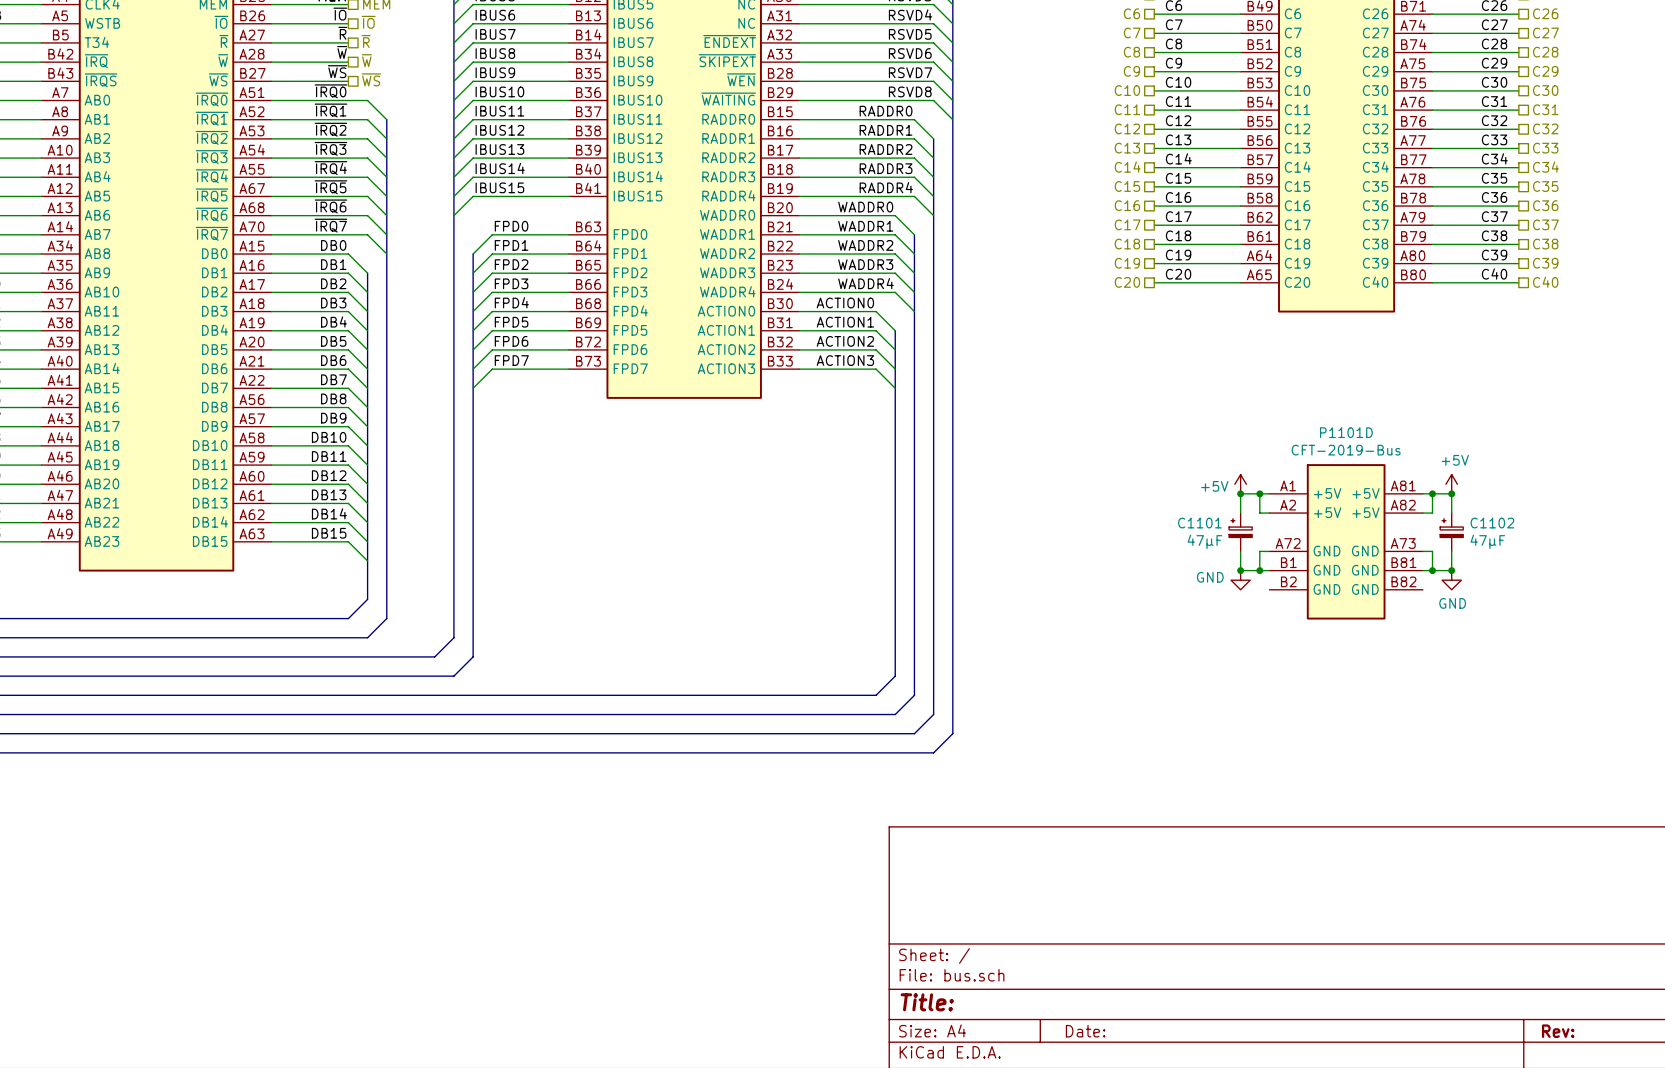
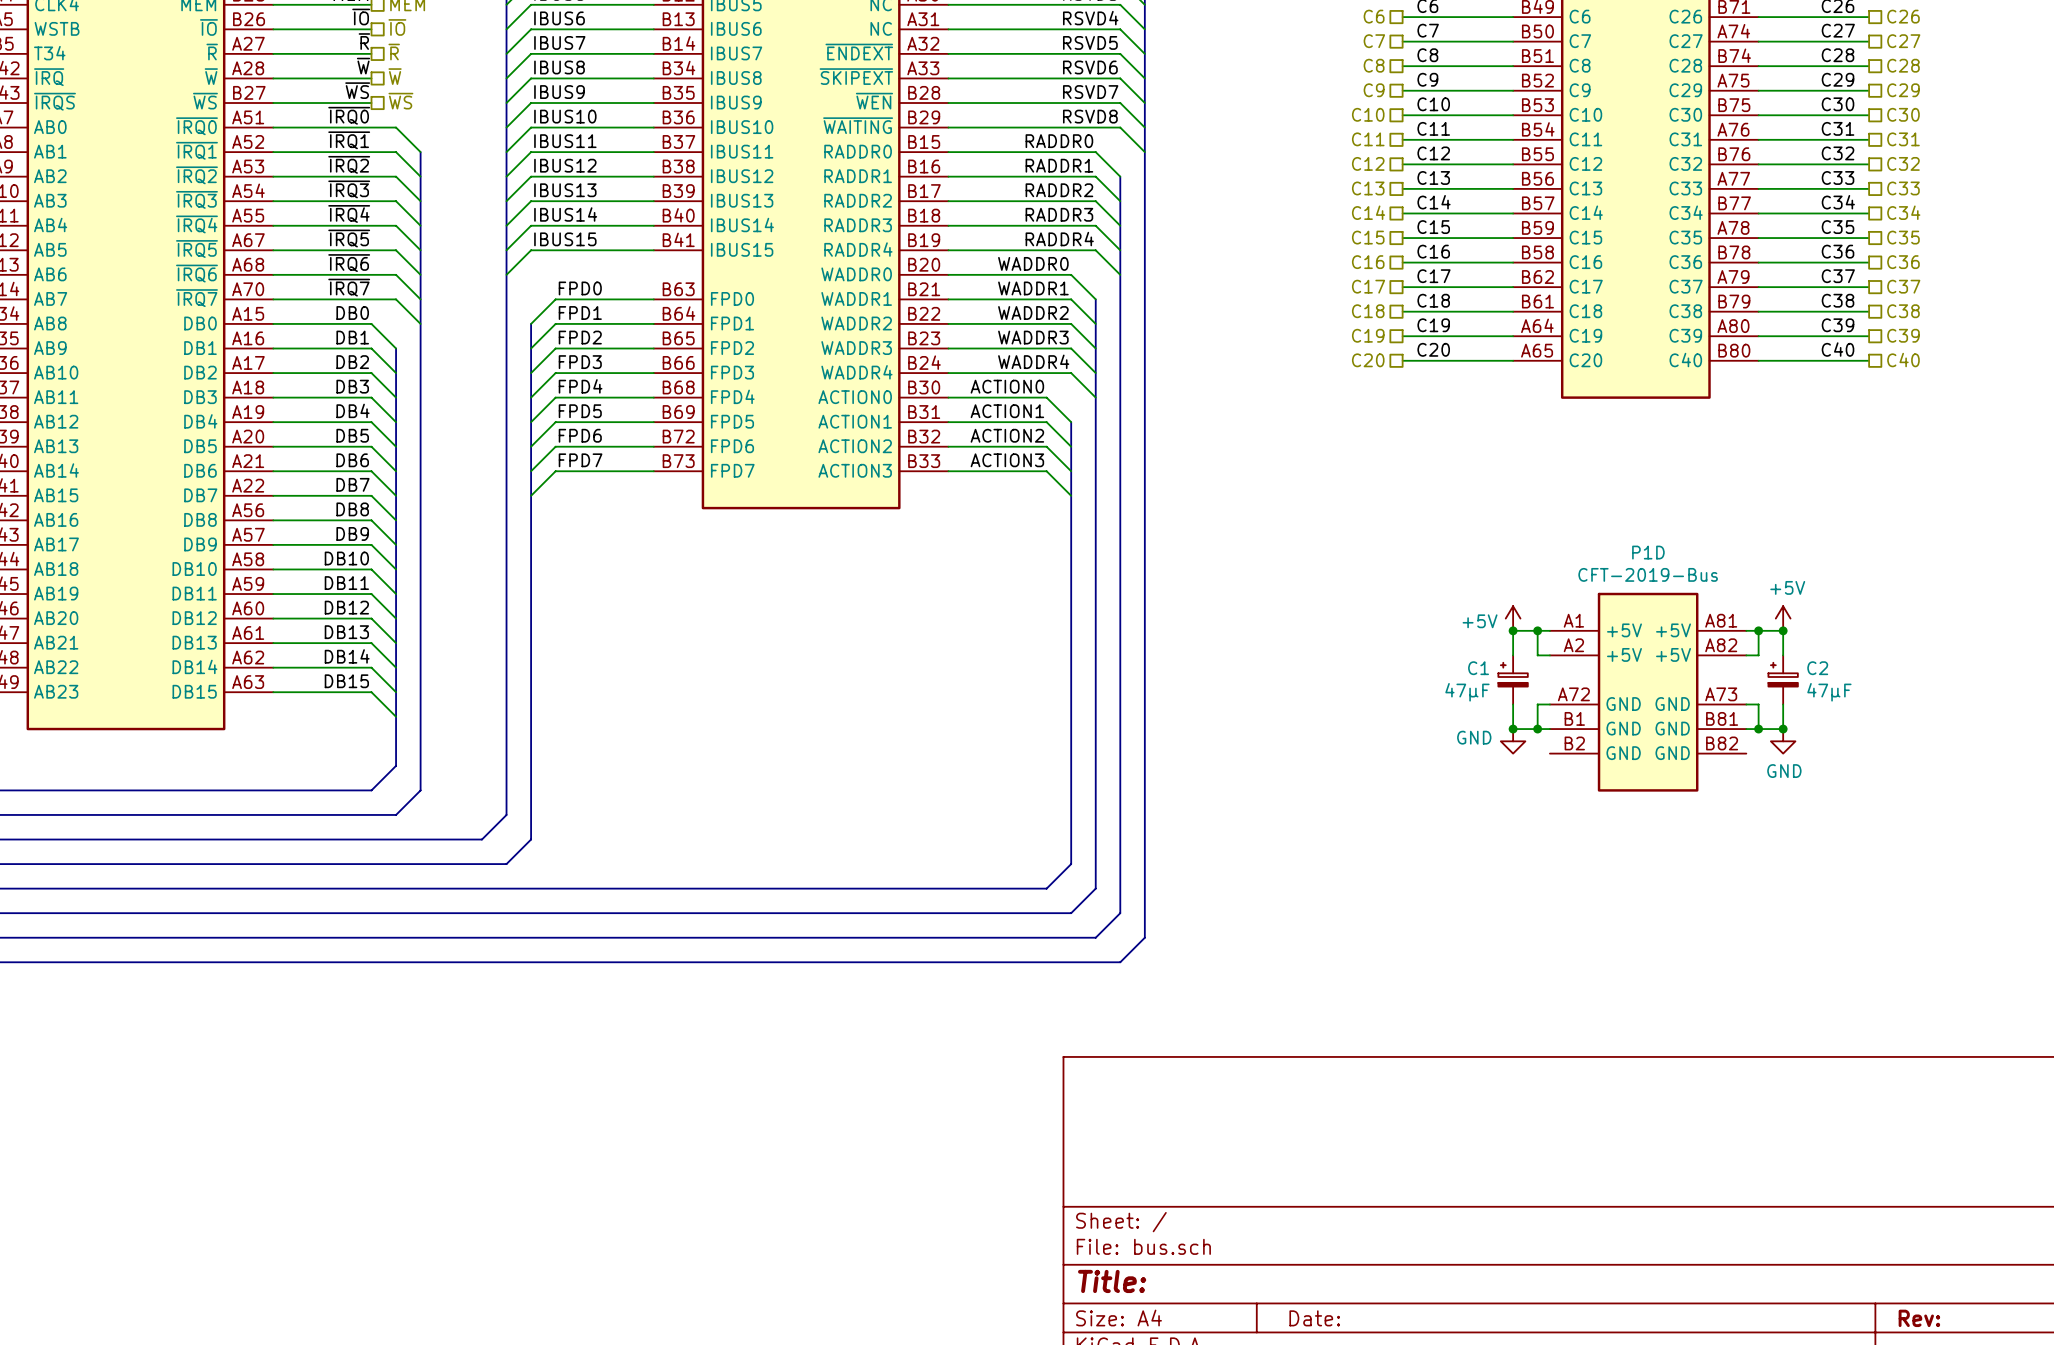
P1101D name: P1101D (1346, 432) -> P1D (1648, 552)
C1101 name: C1101 (1199, 523) -> C1 (1478, 668)
C1102 name: C1102 (1492, 523) -> C2 (1817, 668)

